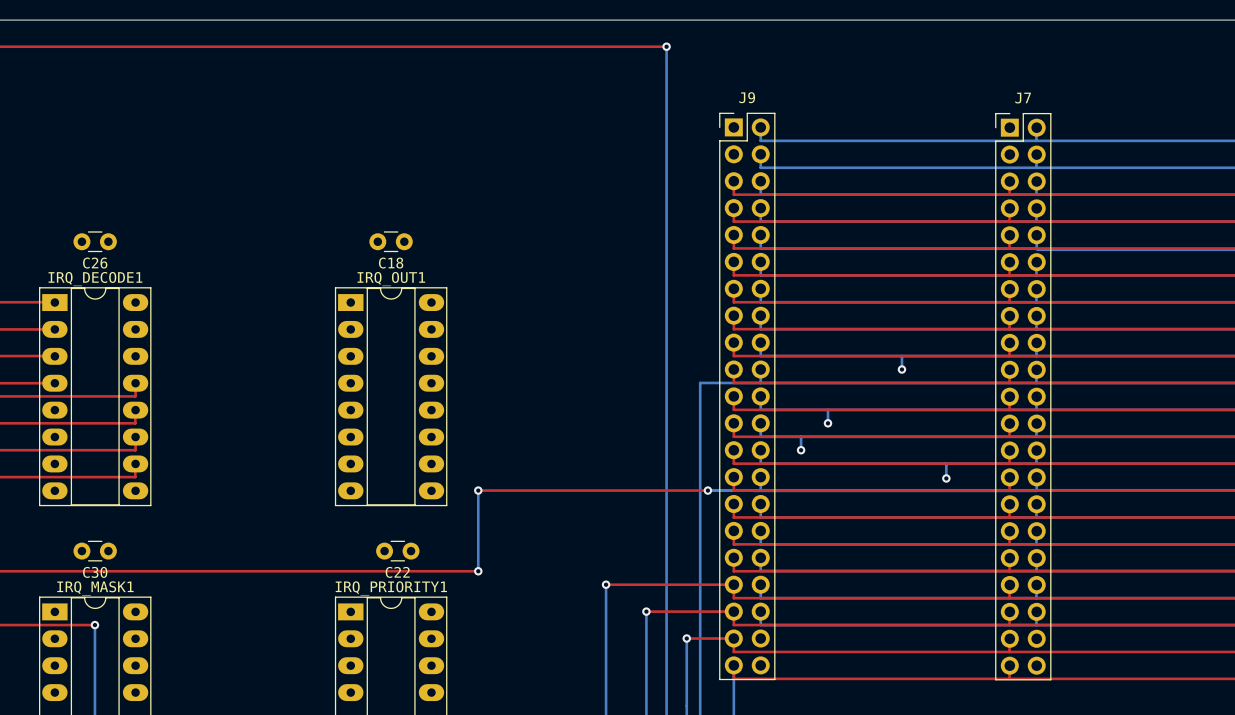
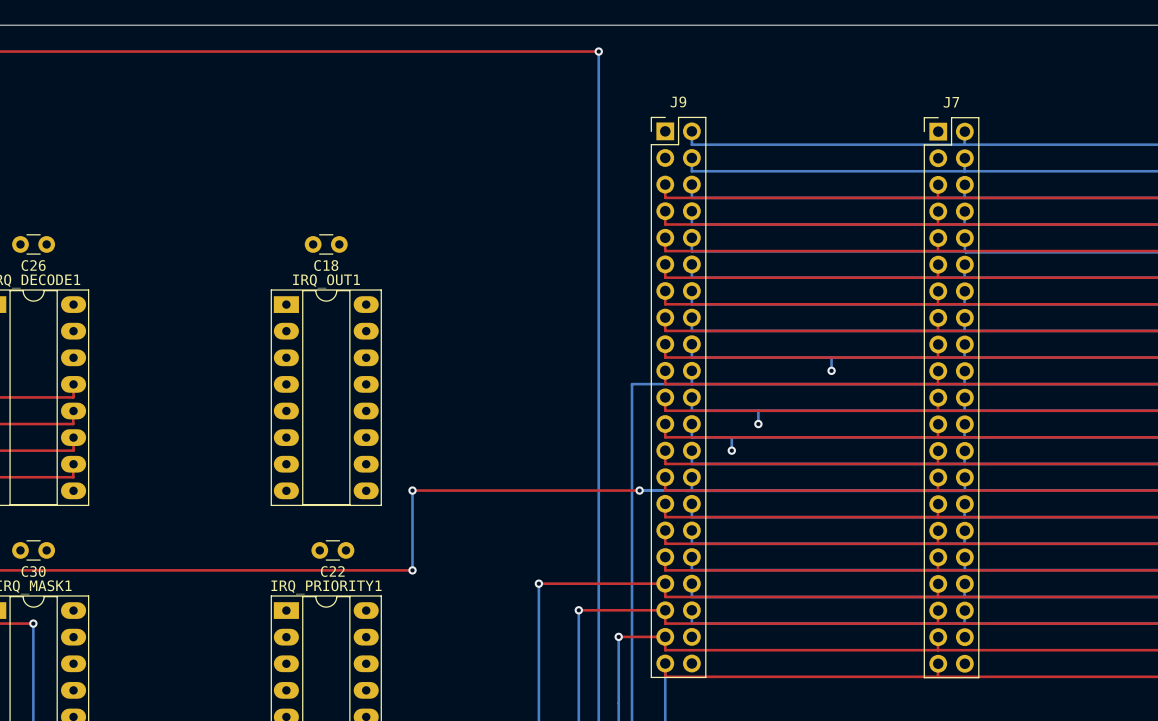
bottom track: (945, 463) (946, 478) -> none
via: (946, 478) -> none

